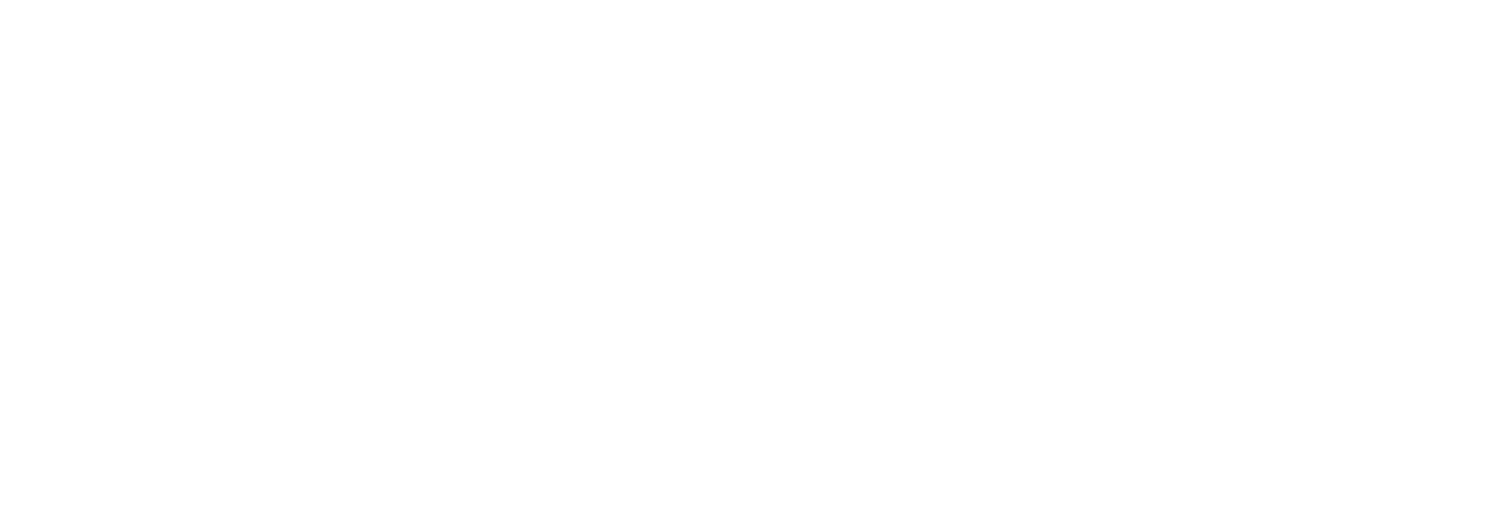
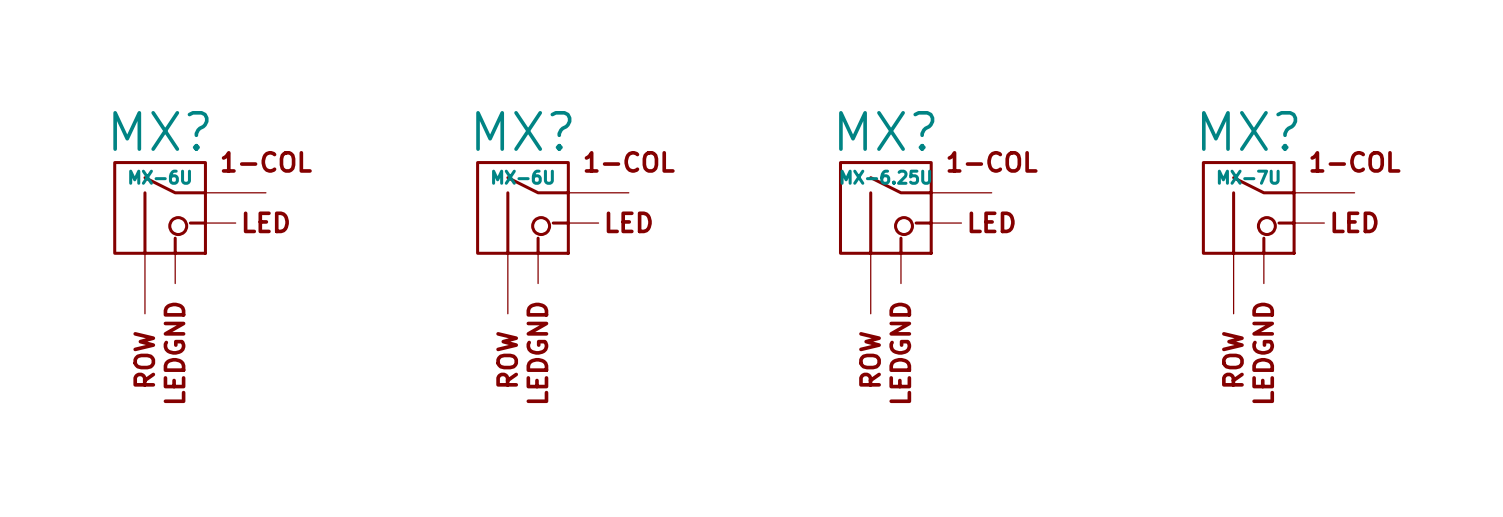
MX?: none -> MX-6U (189, 237)
MX?: none -> MX-6U (552, 237)
MX?: none -> MX-6.25U (915, 237)
MX?: none -> MX-7U (1278, 237)

